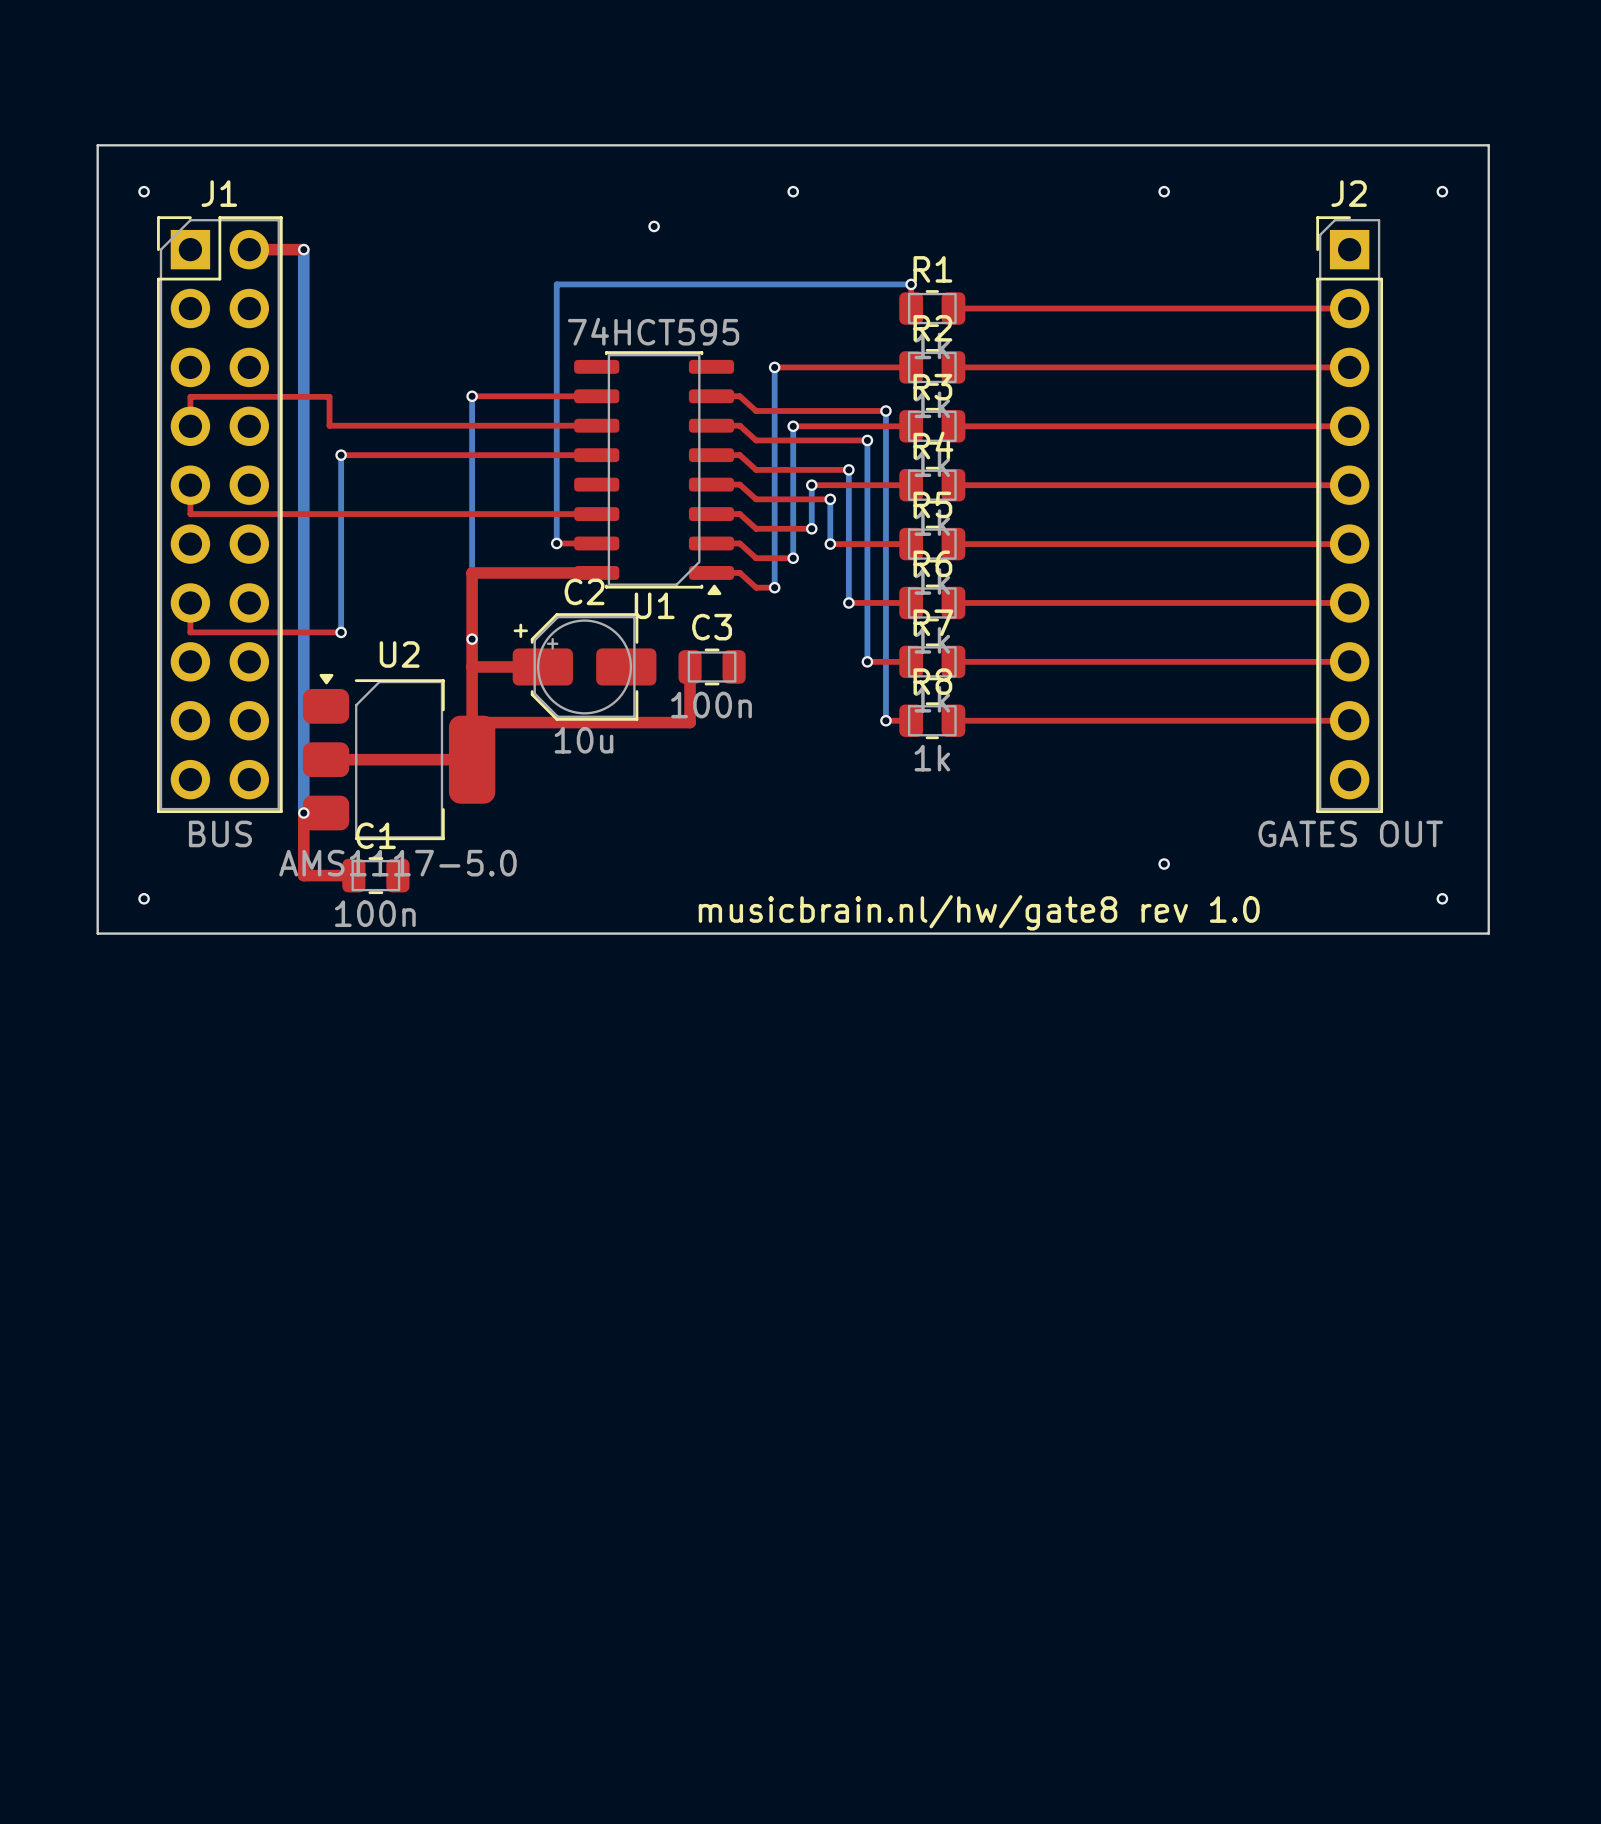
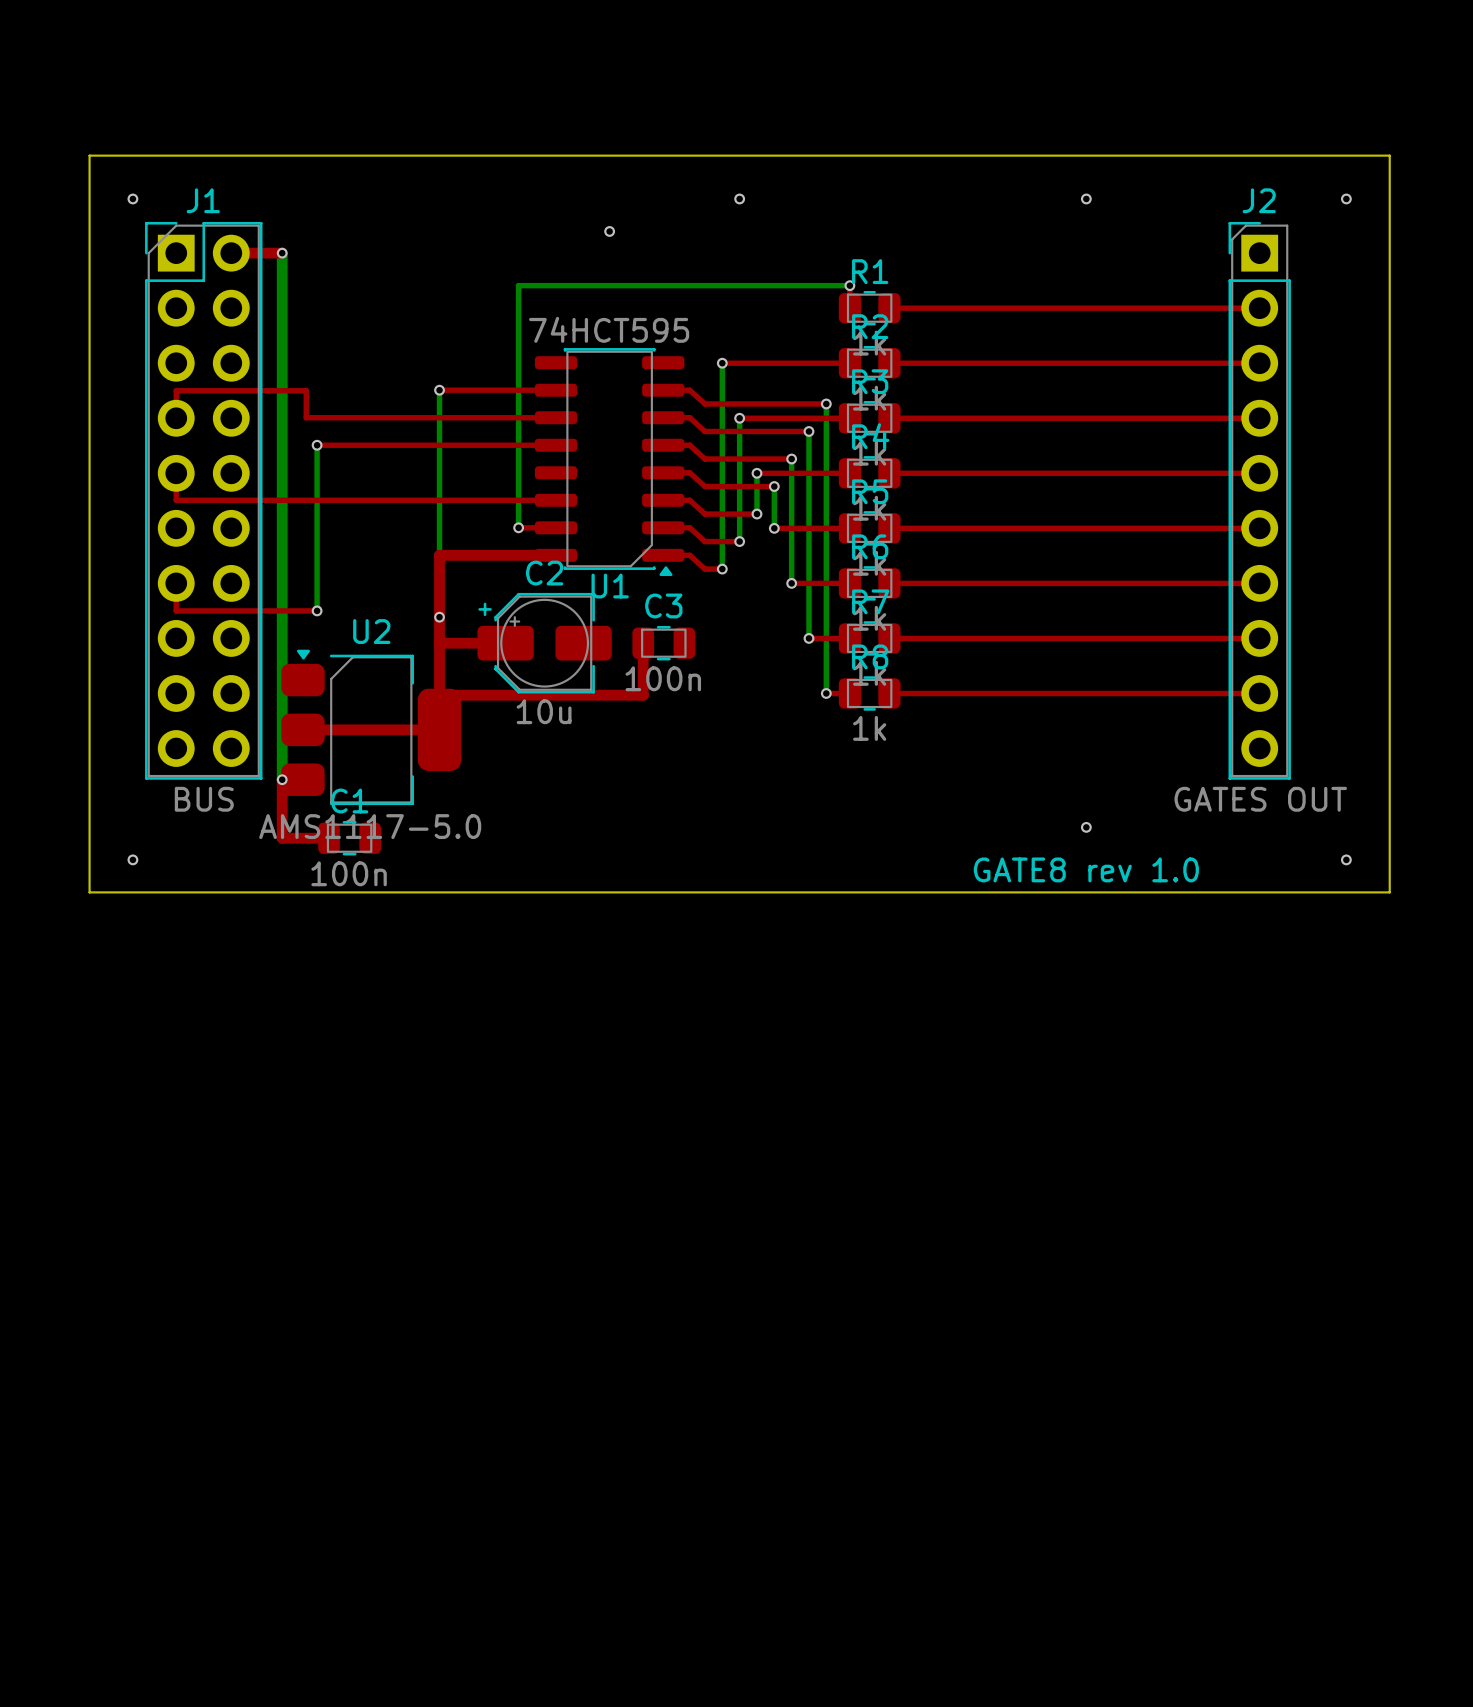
text: none -> GATE8 rev 1.0 (1086, 869)
text: musicbrain.nl/hw/gate8 rev 1.0 (979, 912) -> none

